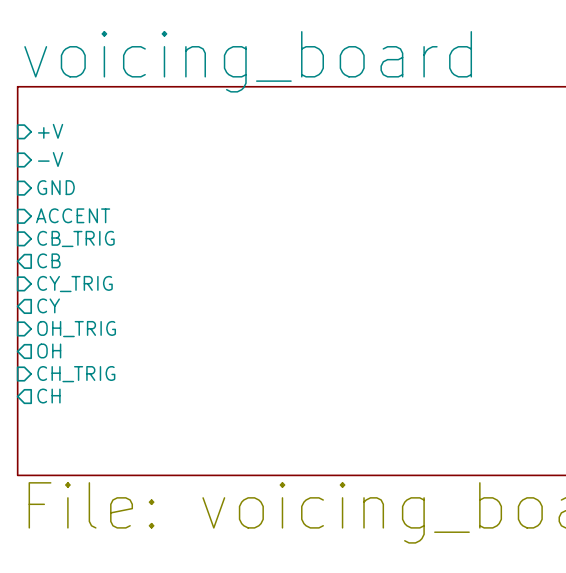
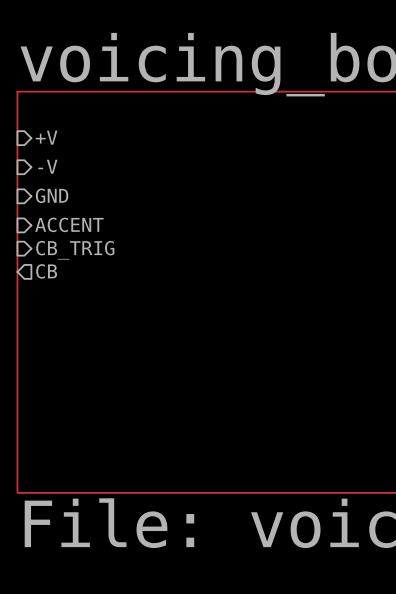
sheet pin: CY_TRIG (75, 284) -> none
sheet pin: CY (48, 305) -> none
sheet pin: OH_TRIG (76, 329) -> none
sheet pin: OH (49, 350) -> none
sheet pin: CH_TRIG (76, 374) -> none
sheet pin: CH (48, 396) -> none

